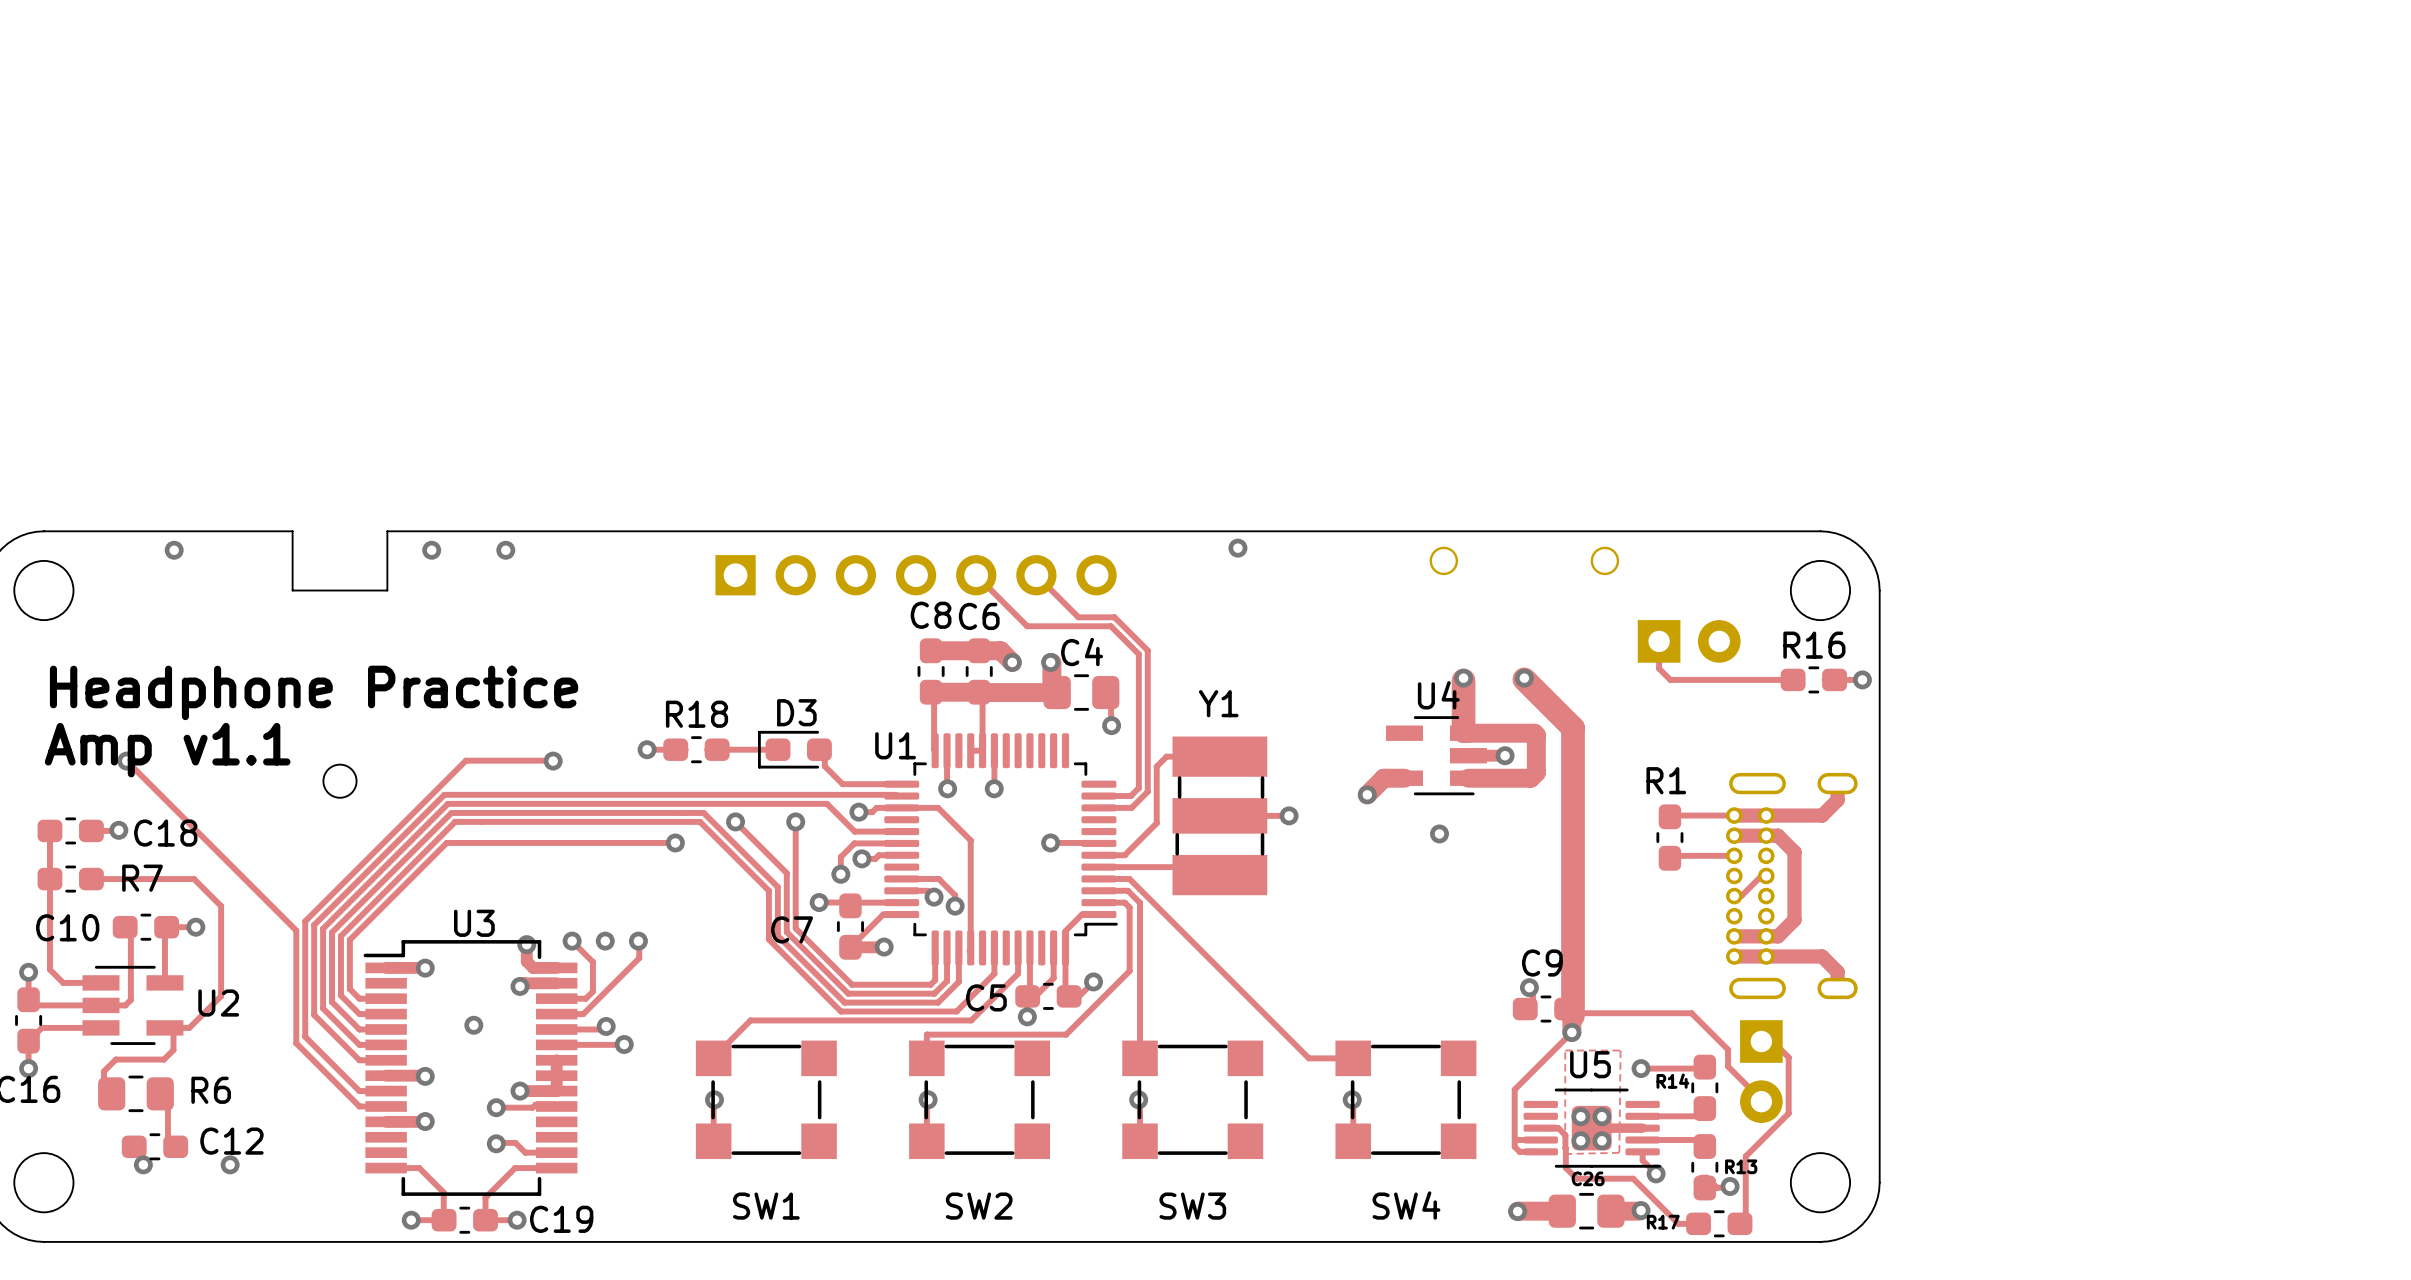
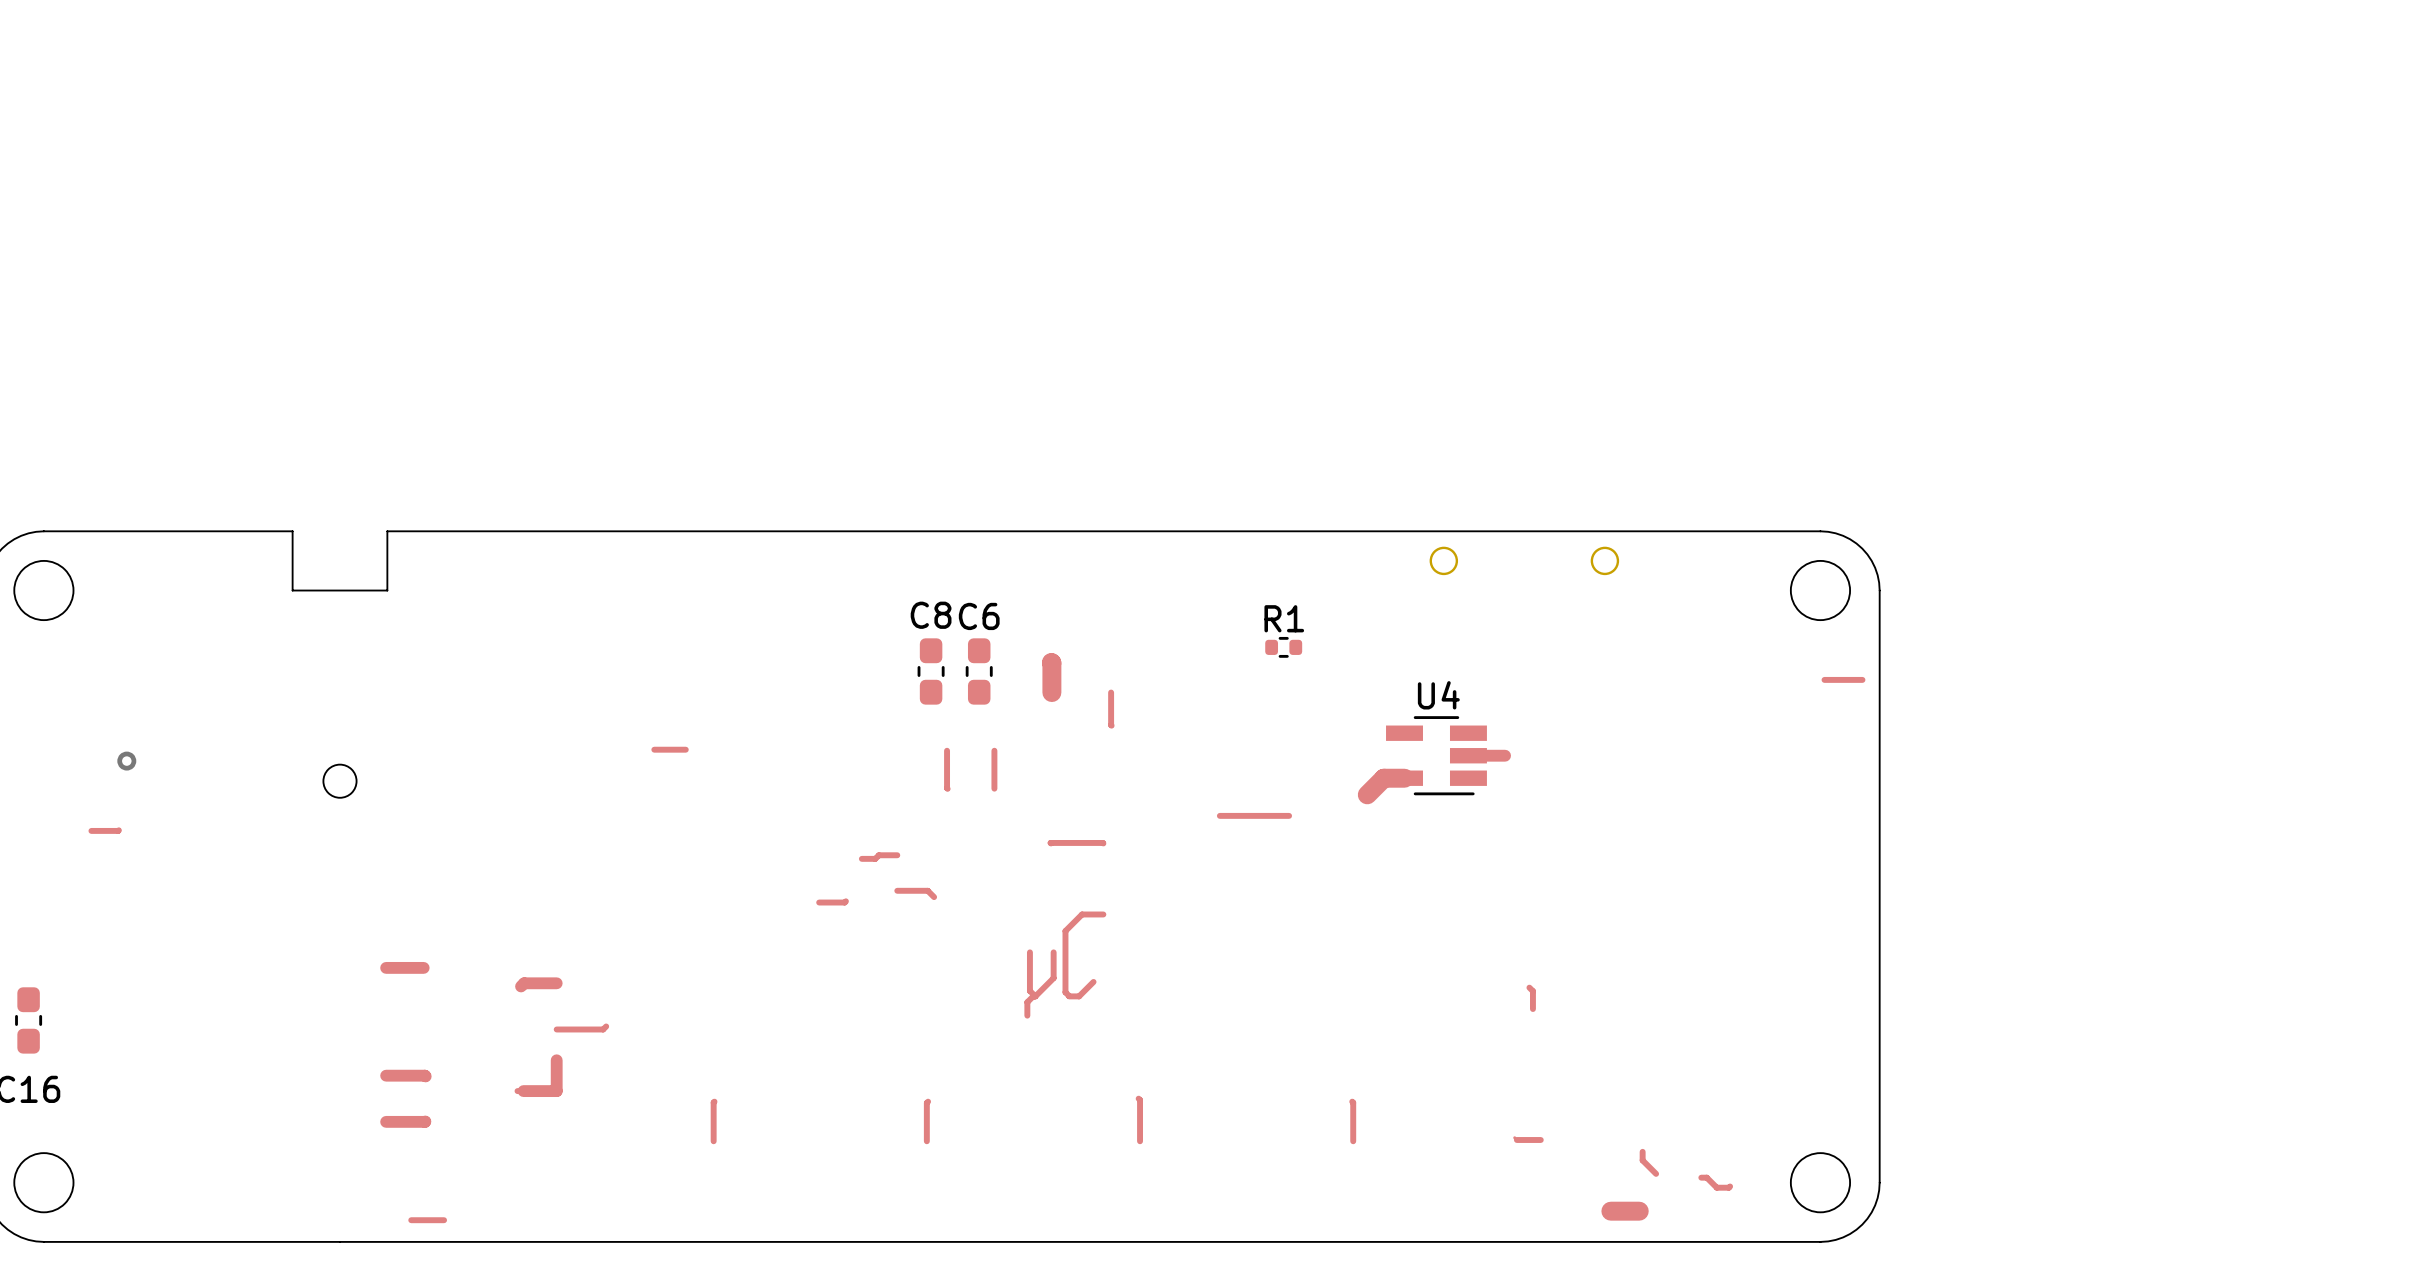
via: (1237, 548) -> none
via: (174, 550) -> none
via: (431, 550) -> none
via: (505, 550) -> none
part: (916, 575) -> none
track: (976, 575) (1027, 626) (1110, 626) (1138, 654) (1138, 788) (1130, 796) (1103, 796) -> none
track: (1036, 575) (1078, 617) (1114, 617) (1147, 650) (1147, 791) (1131, 807) (1103, 807) -> none
track: (1659, 641) (1659, 668) (1670, 679) (1802, 679) -> none
part: (1689, 641) -> none
track: (931, 650) (1000, 650) (1012, 662) -> none
via: (1012, 662) -> none
via: (1050, 662) -> none
track: (1523, 677) (1573, 727) (1573, 1015) -> none
via: (1463, 678) -> none
via: (1524, 678) -> none
R16: (1813, 679) -> none
via: (1862, 679) -> none
track: (1463, 680) (1463, 731) -> none
text: Headphone Practice (314, 692) -> none
track: (979, 692) (1057, 692) -> none
C4: (1081, 692) -> none
via: (1111, 725) -> none
track: (1466, 731) (1468, 733) (1534, 733) (1536, 735) (1536, 772) (1530, 778) (1468, 778) -> none
via: (647, 749) -> none
R18: (696, 749) -> none
track: (707, 749) (772, 749) -> none
D3: (794, 749) -> none
track: (824, 749) (824, 766) (842, 784) (897, 784) -> none
text: Amp v1.1 (167, 750) -> none
track: (935, 750) (934, 695) (931, 692) (979, 692) (982, 695) (982, 750) (970, 750) -> none
via: (1505, 755) -> none
track: (1219, 756) (1166, 756) (1156, 766) (1156, 823) (1124, 855) (1103, 855) -> none
track: (552, 760) (465, 760) (305, 921) (305, 1036) (359, 1091) (386, 1091) -> none
track: (126, 761) (296, 930) (296, 1043) (359, 1106) (386, 1106) -> none
via: (553, 761) -> none
track: (1837, 783) (1837, 800) (1822, 815) (1669, 816) -> none
via: (947, 788) -> none
via: (994, 788) -> none
via: (1367, 794) -> none
track: (897, 796) (444, 794) (314, 925) (314, 1014) (359, 1060) (386, 1060) -> none
R1 footprint: [1656, 804, 1684, 871] -> [1265, 636, 1303, 658]
track: (858, 812) (872, 812) (876, 807) (938, 807) (970, 840) (969, 951) -> none
via: (858, 812) -> none
track: (735, 815) (735, 821) (786, 873) (786, 932) (848, 993) (934, 993) (947, 981) (947, 952) -> none
Y1: (1219, 815) -> none
via: (1289, 815) -> none
via: (735, 821) -> none
track: (795, 821) (795, 928) (852, 984) (930, 984) (935, 980) (935, 952) -> none
via: (795, 821) -> none
track: (49, 830) (49, 969) (63, 982) (101, 982) -> none
C18: (70, 830) -> none
via: (118, 830) -> none
track: (897, 831) (854, 831) (827, 803) (447, 803) (323, 928) (323, 1008) (359, 1044) (386, 1044) -> none
via: (1439, 833) -> none
track: (1734, 835) (1778, 835) (1794, 852) (1794, 919) (1778, 936) (1734, 936) -> none
track: (675, 842) (446, 842) (349, 939) (349, 989) (359, 998) (386, 998) -> none
via: (675, 842) -> none
via: (1050, 842) -> none
track: (901, 843) (854, 843) (840, 857) (840, 874) -> none
U1: (1001, 849) -> none
track: (1734, 855) (1672, 855) (1669, 858) -> none
via: (861, 858) -> none
track: (1103, 867) (1211, 867) (1219, 875) -> none
via: (840, 874) -> none
track: (1766, 875) (1761, 875) (1741, 896) (1734, 896) -> none
track: (897, 878) (938, 878) (955, 895) (955, 906) -> none
track: (1103, 878) (1129, 878) (1308, 1058) (1353, 1058) -> none
R7: (70, 879) -> none
track: (91, 879) (194, 879) (221, 906) (221, 996) (189, 1027) (164, 1027) -> none
part: (1791, 886) -> none
track: (1103, 890) (1127, 890) (1140, 902) (1140, 1058) -> none
via: (934, 897) -> none
via: (819, 902) -> none
track: (897, 902) (853, 902) (850, 905) -> none
track: (1103, 902) (1124, 902) (1129, 907) (1129, 971) (1066, 1034) (926, 1034) (926, 1058) -> none
via: (955, 906) -> none
track: (897, 914) (883, 914) (850, 947) (883, 947) -> none
C7: (850, 926) -> none
track: (125, 927) (130, 932) (130, 999) (125, 1005) (34, 1005) (28, 999) (28, 972) -> none
C10: (145, 927) -> none
track: (195, 927) (166, 927) (164, 928) (164, 982) -> none
via: (195, 927) -> none
via: (572, 941) -> none
via: (605, 941) -> none
via: (638, 941) -> none
track: (573, 942) (592, 962) (592, 991) (585, 998) (556, 998) -> none
track: (639, 942) (639, 958) (583, 1014) (556, 1014) -> none
track: (526, 944) (526, 961) (533, 967) (556, 967) -> none
via: (526, 944) -> none
via: (884, 947) -> none
track: (958, 952) (958, 981) (938, 1002) (844, 1002) (777, 935) (777, 887) (703, 812) (451, 812) (332, 932) (332, 1002) (359, 1029) (386, 1029) -> none
track: (994, 952) (994, 973) (956, 1011) (840, 1011) (768, 939) (768, 890) (700, 821) (455, 821) (340, 936) (340, 995) (359, 1014) (386, 1014) -> none
track: (1018, 952) (1018, 973) (971, 1020) (750, 1020) (713, 1058) -> none
track: (1734, 956) (1822, 956) (1837, 971) (1837, 988) -> none
via: (425, 968) -> none
via: (28, 972) -> none
via: (1093, 981) -> none
via: (520, 986) -> none
via: (1529, 987) -> none
C5: (1048, 996) -> none
U2: (132, 1005) -> none
C9: (1545, 1009) -> none
track: (1573, 1015) (1571, 1032) (1514, 1089) (1514, 1146) (1519, 1151) (1534, 1151) -> none
track: (1573, 1015) (1575, 1013) (1691, 1013) (1728, 1049) (1728, 1066) (1749, 1087) (1749, 1101) -> none
via: (1027, 1016) -> none
via: (473, 1025) -> none
via: (606, 1026) -> none
track: (101, 1027) (41, 1027) (28, 1041) (28, 1068) -> none
track: (173, 1027) (173, 1050) (163, 1059) (115, 1059) (104, 1071) (104, 1093) -> none
via: (1571, 1032) -> none
track: (1761, 1041) (1772, 1041) (1788, 1057) (1788, 1113) (1745, 1156) (1745, 1218) (1739, 1223) -> none
track: (624, 1044) (556, 1044) -> none
via: (624, 1044) -> none
zone outline: (1565, 1050) (1565, 1154) (1619, 1152) (1620, 1050) (1565, 1050) -> none
U3: (470, 1067) -> none
track: (1704, 1067) (1641, 1068) -> none
via: (28, 1068) -> none
via: (1641, 1068) -> none
part: (1761, 1071) -> none
via: (425, 1076) -> none
R14: (1704, 1087) -> none
via: (520, 1091) -> none
R6: (135, 1093) -> none
track: (167, 1093) (167, 1146) -> none
via: (714, 1099) -> none
SW1: (766, 1099) -> none
via: (928, 1099) -> none
SW2: (979, 1099) -> none
via: (1138, 1099) -> none
SW3: (1192, 1099) -> none
via: (1352, 1099) -> none
SW4: (1405, 1099) -> none
track: (556, 1106) (554, 1104) (535, 1104) (532, 1107) (497, 1107) -> none
via: (496, 1107) -> none
track: (1700, 1115) (1641, 1116) -> none
via: (1580, 1116) -> none
via: (1601, 1116) -> none
via: (425, 1121) -> none
track: (1541, 1128) (1558, 1128) (1565, 1135) (1565, 1167) (1576, 1178) (1633, 1178) (1678, 1223) (1698, 1223) -> none
track: (1591, 1128) (1642, 1128) -> none
U5: (1592, 1128) -> none
track: (1641, 1139) (1698, 1139) (1704, 1146) (1702, 1146) -> none
via: (1580, 1140) -> none
via: (1601, 1140) -> none
track: (490, 1142) (515, 1142) (525, 1152) (556, 1152) -> none
via: (496, 1143) -> none
C12: (154, 1146) -> none
via: (143, 1164) -> none
via: (230, 1164) -> none
R13: (1704, 1167) -> none
track: (386, 1168) (419, 1168) (443, 1192) (443, 1220) -> none
track: (556, 1168) (515, 1168) (485, 1197) (485, 1220) (517, 1220) -> none
via: (1656, 1173) -> none
via: (1730, 1186) -> none
via: (1641, 1210) -> none
via: (1517, 1211) -> none
track: (1518, 1211) (1556, 1211) -> none
C26: (1586, 1211) -> none
via: (411, 1220) -> none
C19: (464, 1220) -> none
via: (517, 1220) -> none
R17: (1719, 1223) -> none

